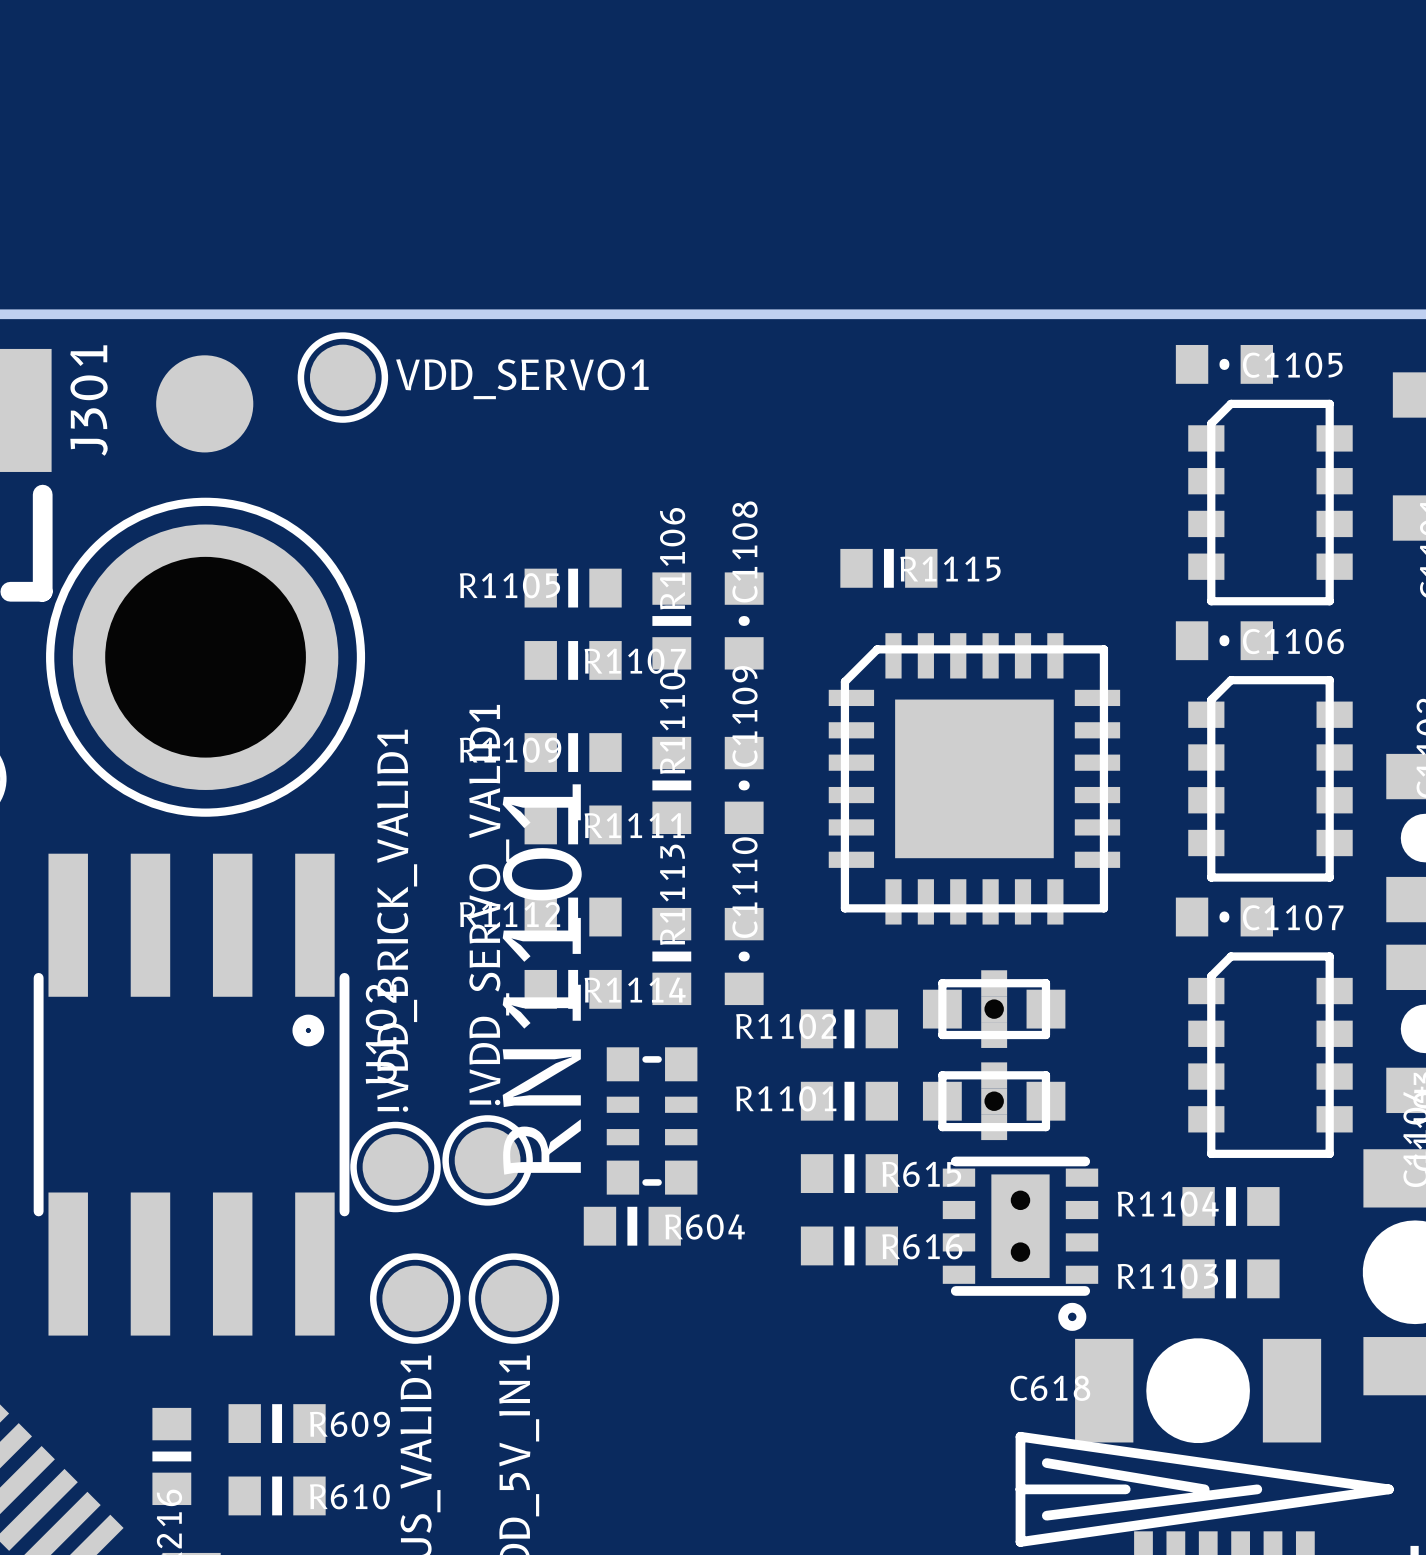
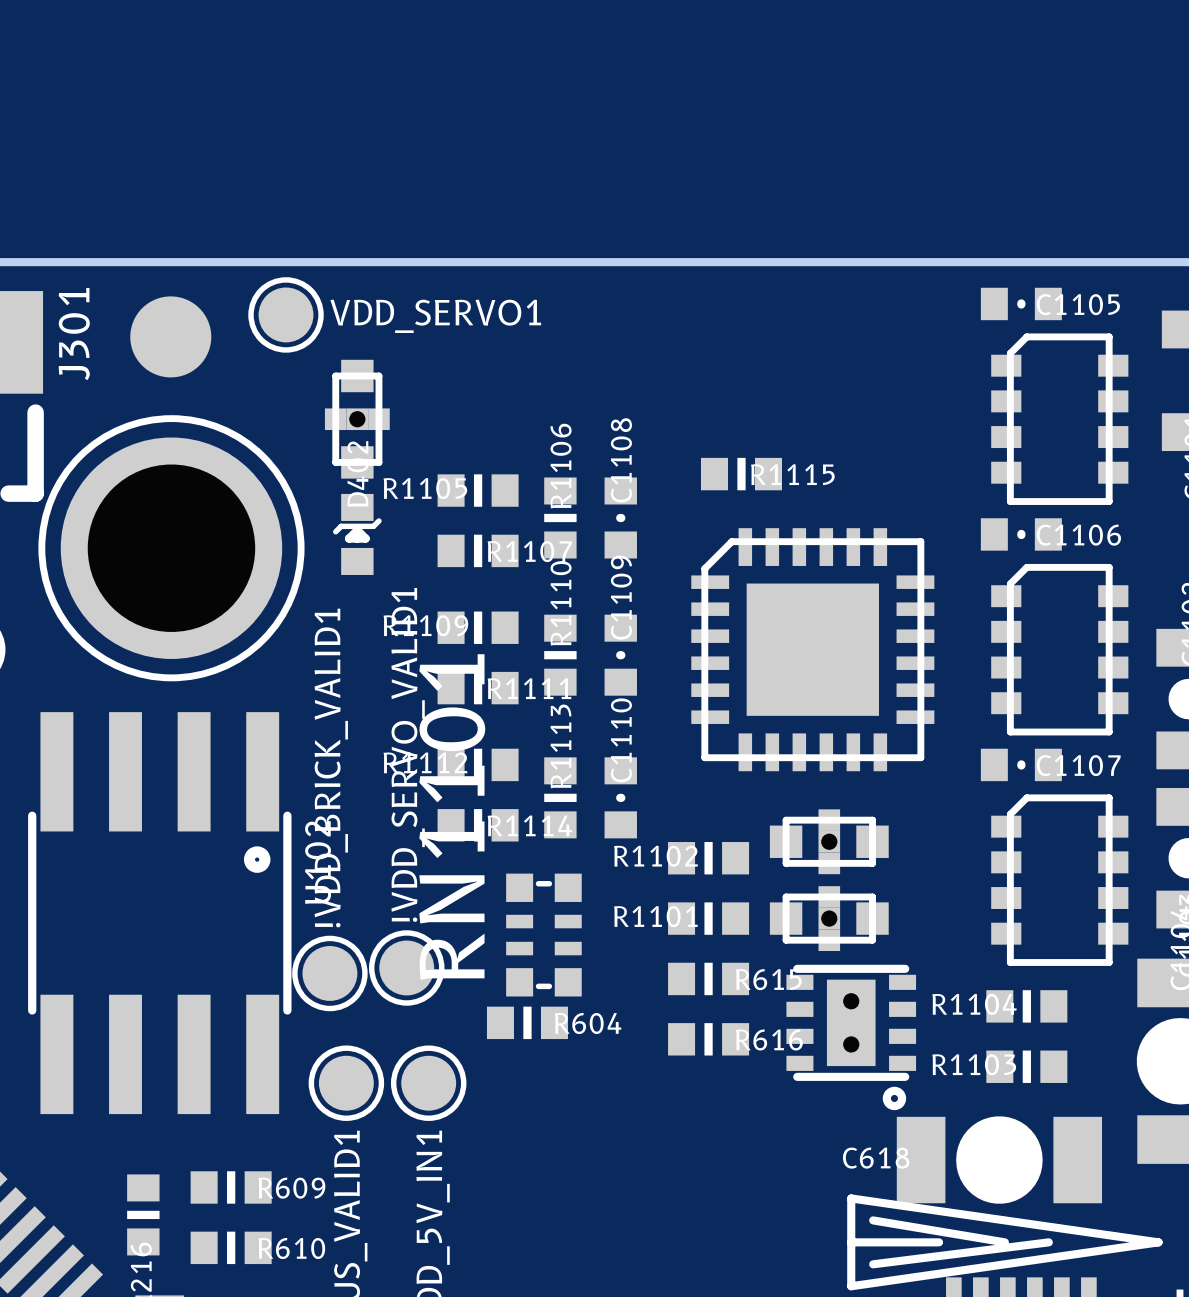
part: none -> (357, 419)
part: none -> (357, 534)

